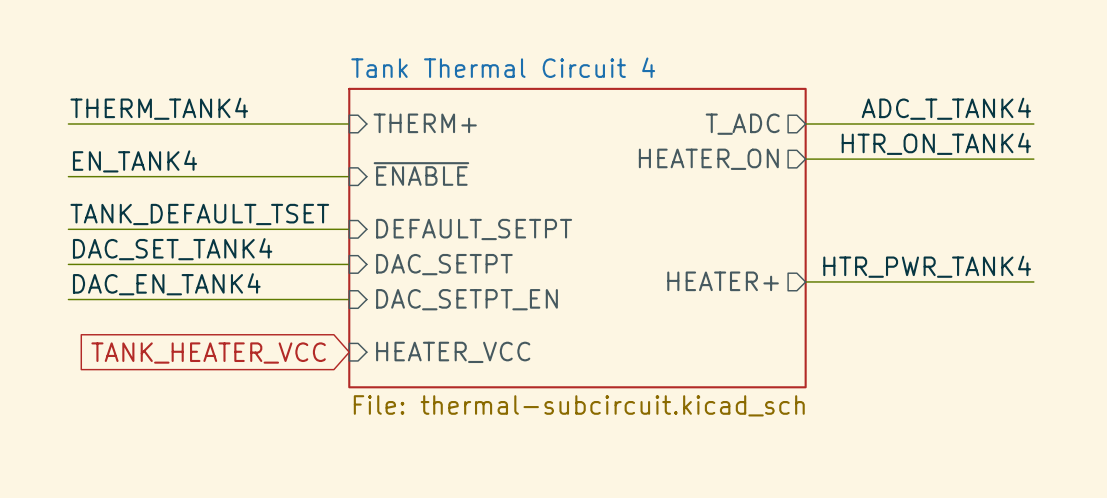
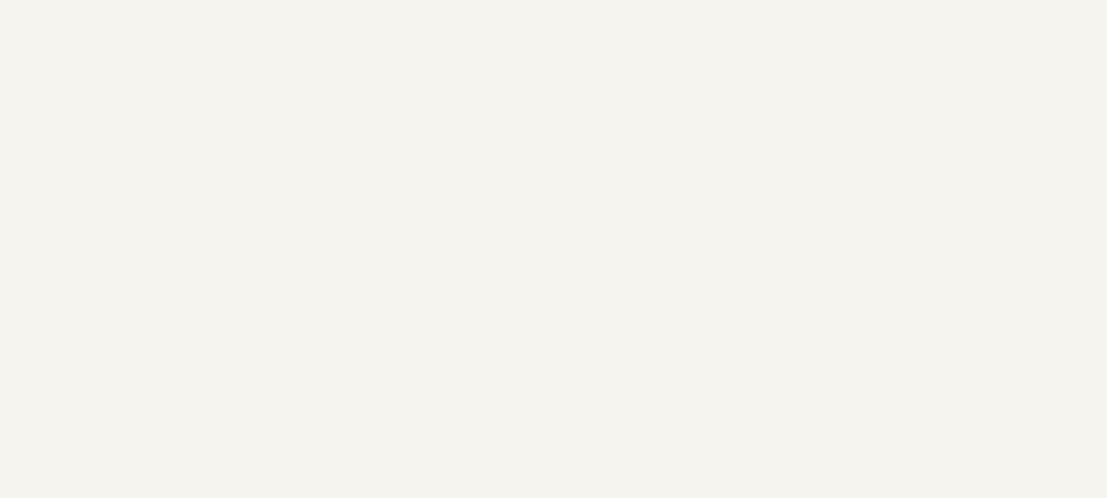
label: THERM_TANK4 (159, 108) -> none
label: ADC_T_TANK4 (946, 108) -> none
wire: (68, 123) (349, 123) -> none
sheet pin: THERM+ (425, 123) -> none
wire: (805, 123) (1033, 123) -> none
sheet pin: T_ADC (742, 124) -> none
label: HTR_ON_TANK4 (936, 143) -> none
sheet pin: HEATER_ON (708, 159) -> none
wire: (805, 159) (1033, 159) -> none
label: EN_TANK4 (135, 161) -> none
sheet pin: ~{ENABLE} (421, 173) -> none
wire: (68, 176) (349, 176) -> none
label: TANK_DEFAULT_TSET (199, 214) -> none
wire: (68, 229) (349, 229) -> none
sheet pin: DEFAULT_SETPT (474, 229) -> none
sheet Tank Thermal Circuit 4: File: thermal-subcircuit.kicad_sch (577, 238) -> none
label: DAC_SET_TANK4 (172, 249) -> none
wire: (68, 264) (349, 264) -> none
sheet pin: DAC_SETPT (444, 264) -> none
label: HTR_PWR_TANK4 (927, 266) -> none
sheet pin: HEATER+ (723, 281) -> none
wire: (805, 281) (1033, 281) -> none
label: DAC_EN_TANK4 (166, 284) -> none
wire: (68, 299) (349, 299) -> none
sheet pin: DAC_SETPT_EN (466, 299) -> none
sheet pin: HEATER_VCC (453, 352) -> none
global label: TANK_HEATER_VCC (208, 353) -> none

